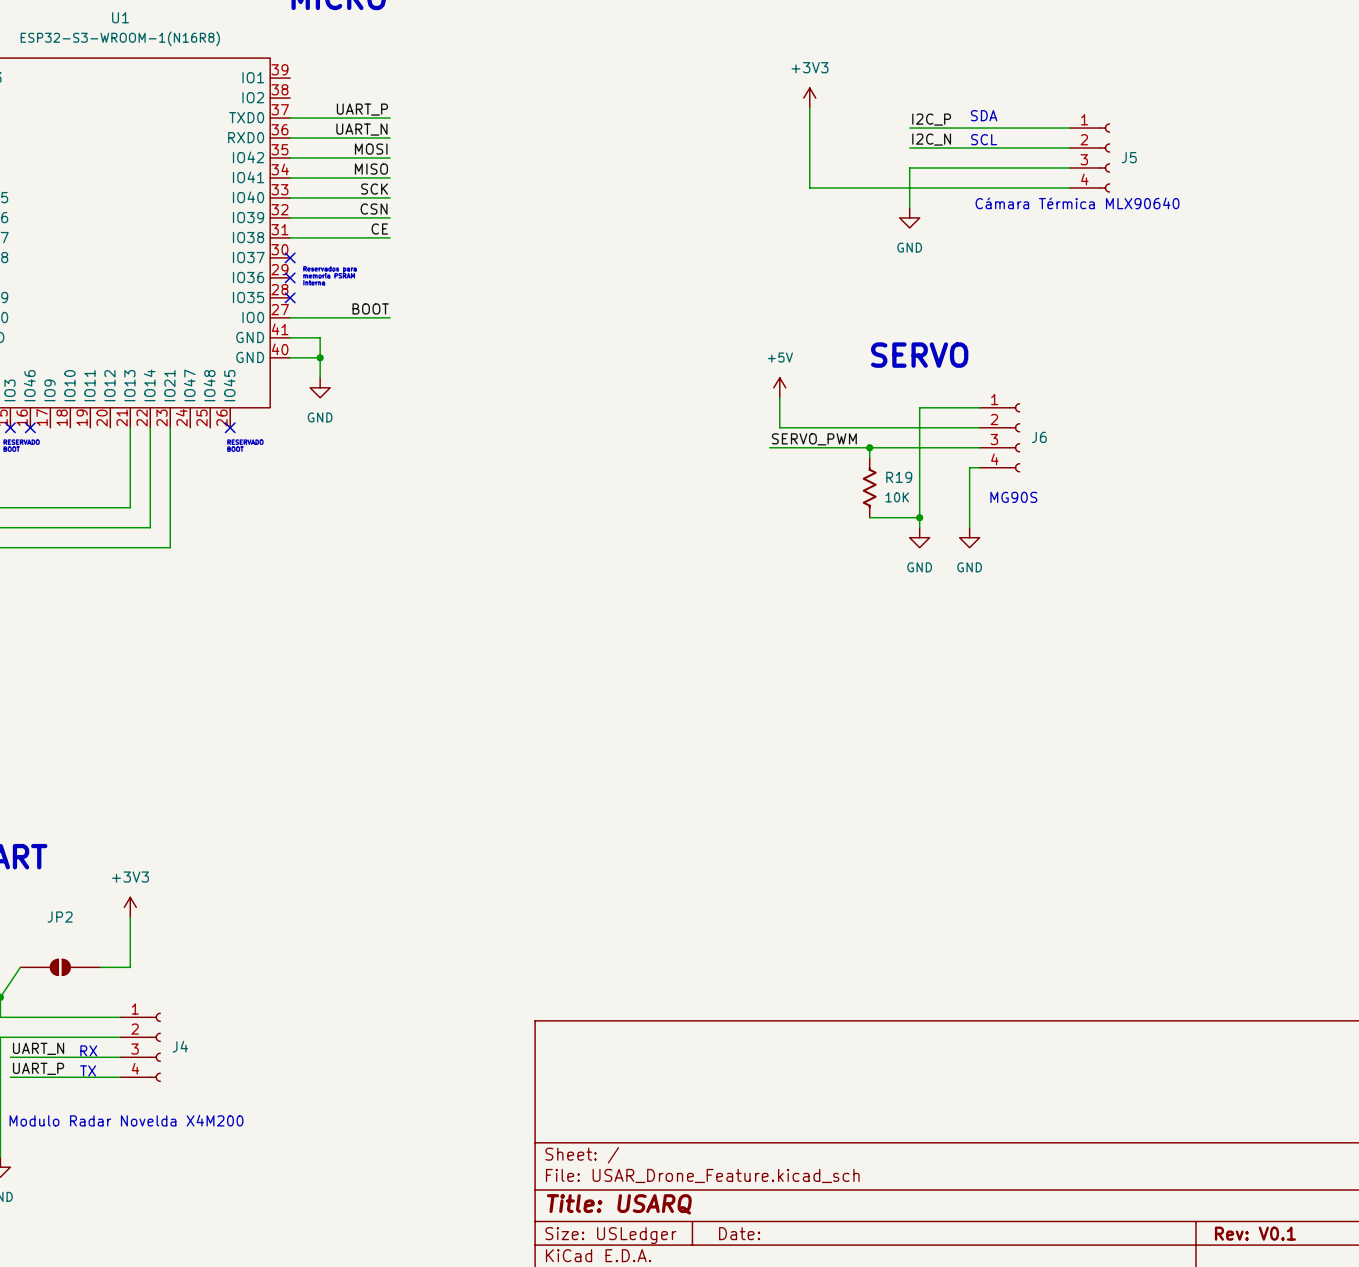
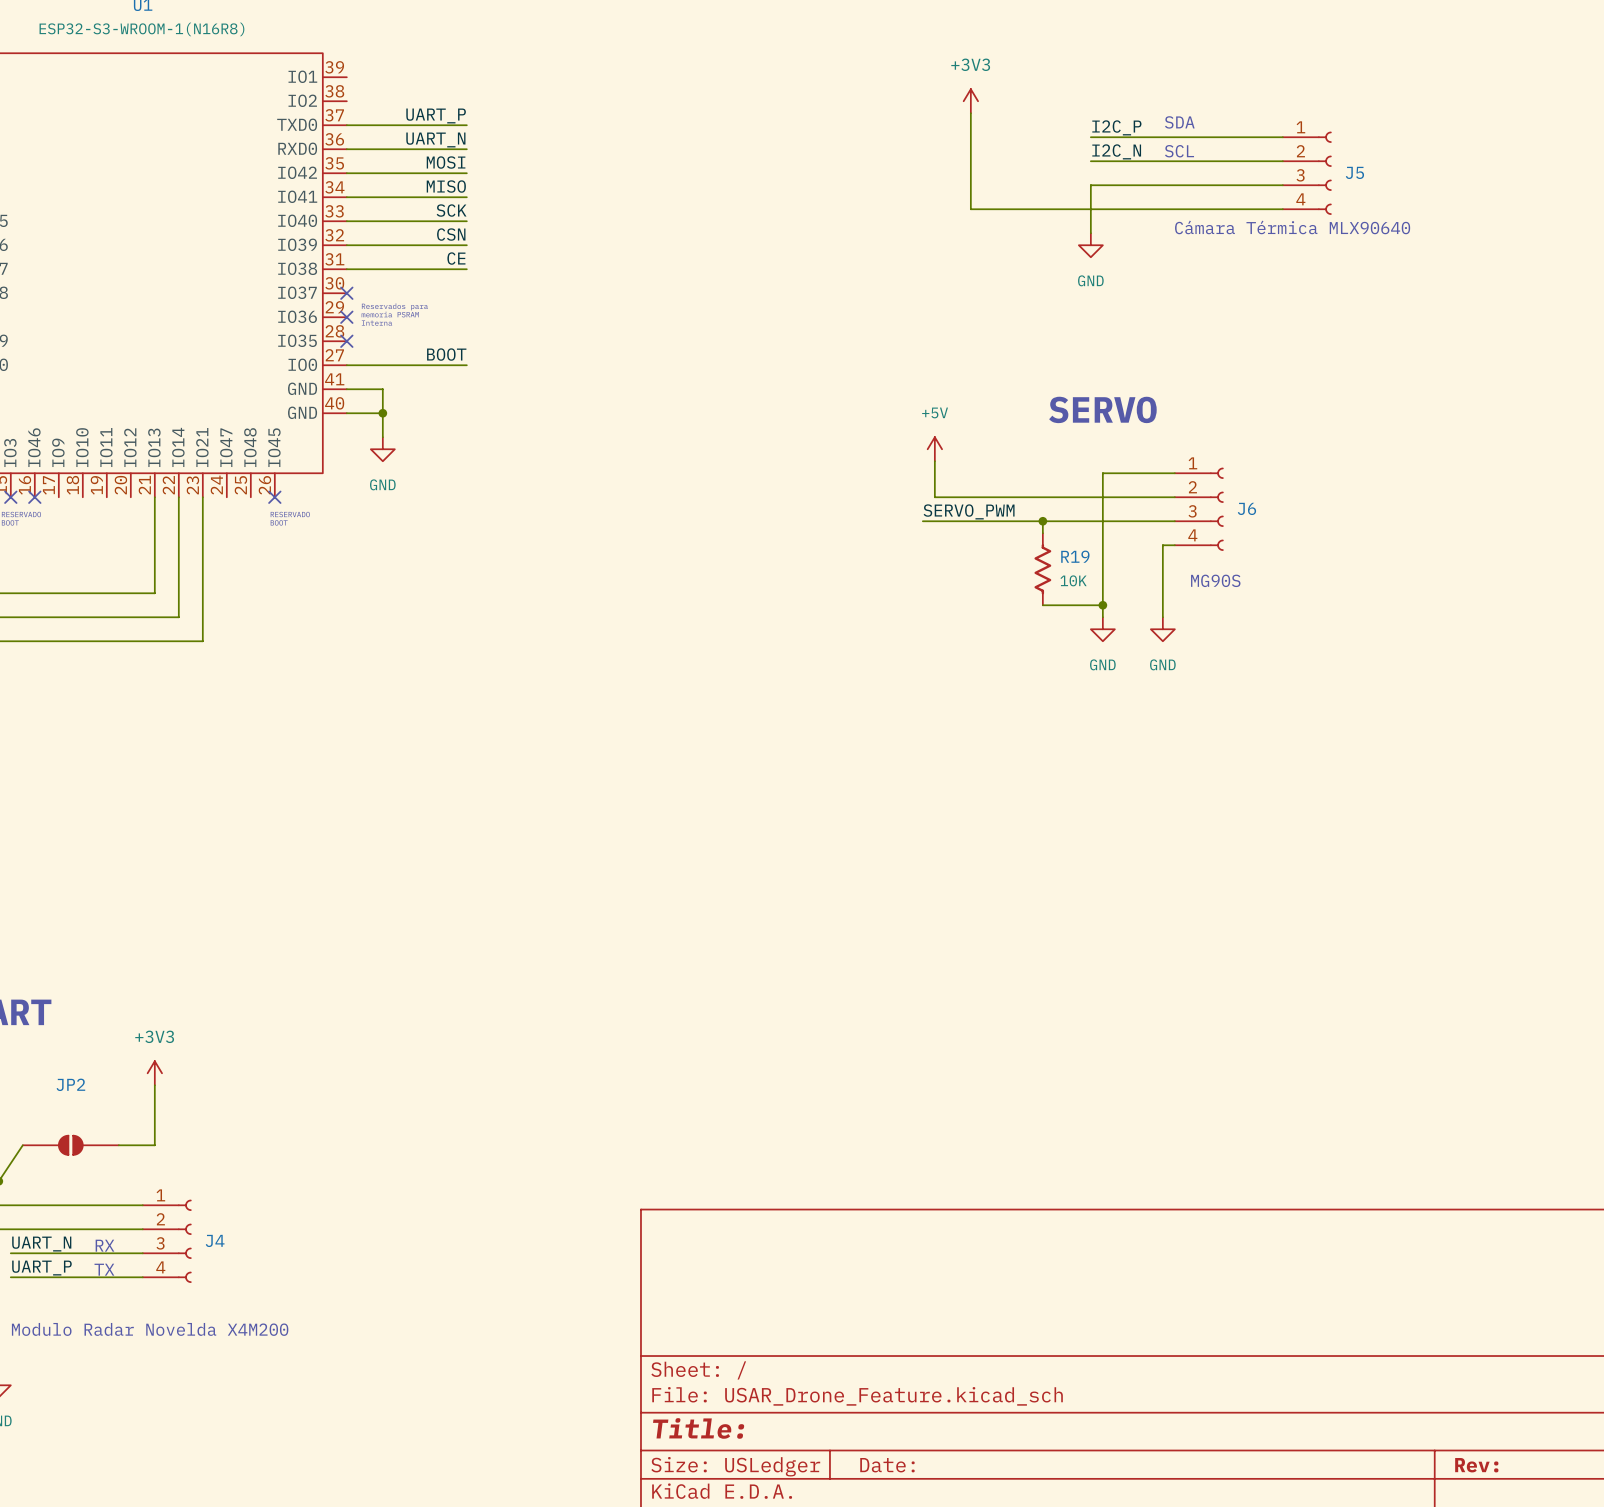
title block: Title: USARQ (619, 1204) -> Title: (698, 1428)
title block: Rev: V0.1 (1255, 1233) -> Rev: (1476, 1465)

